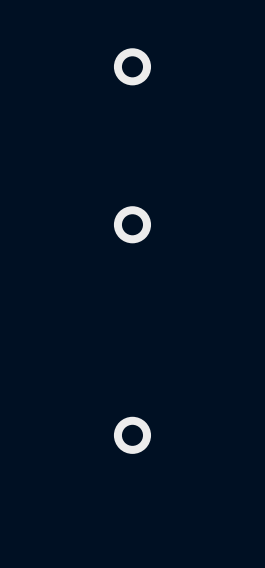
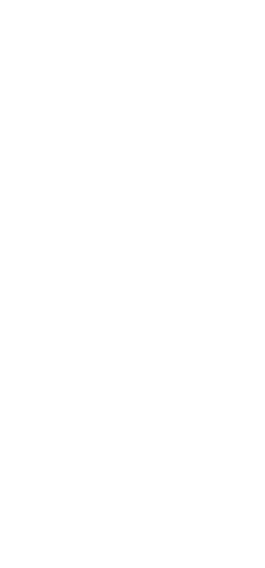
via: (132, 66) -> none
via: (132, 224) -> none
via: (132, 435) -> none

